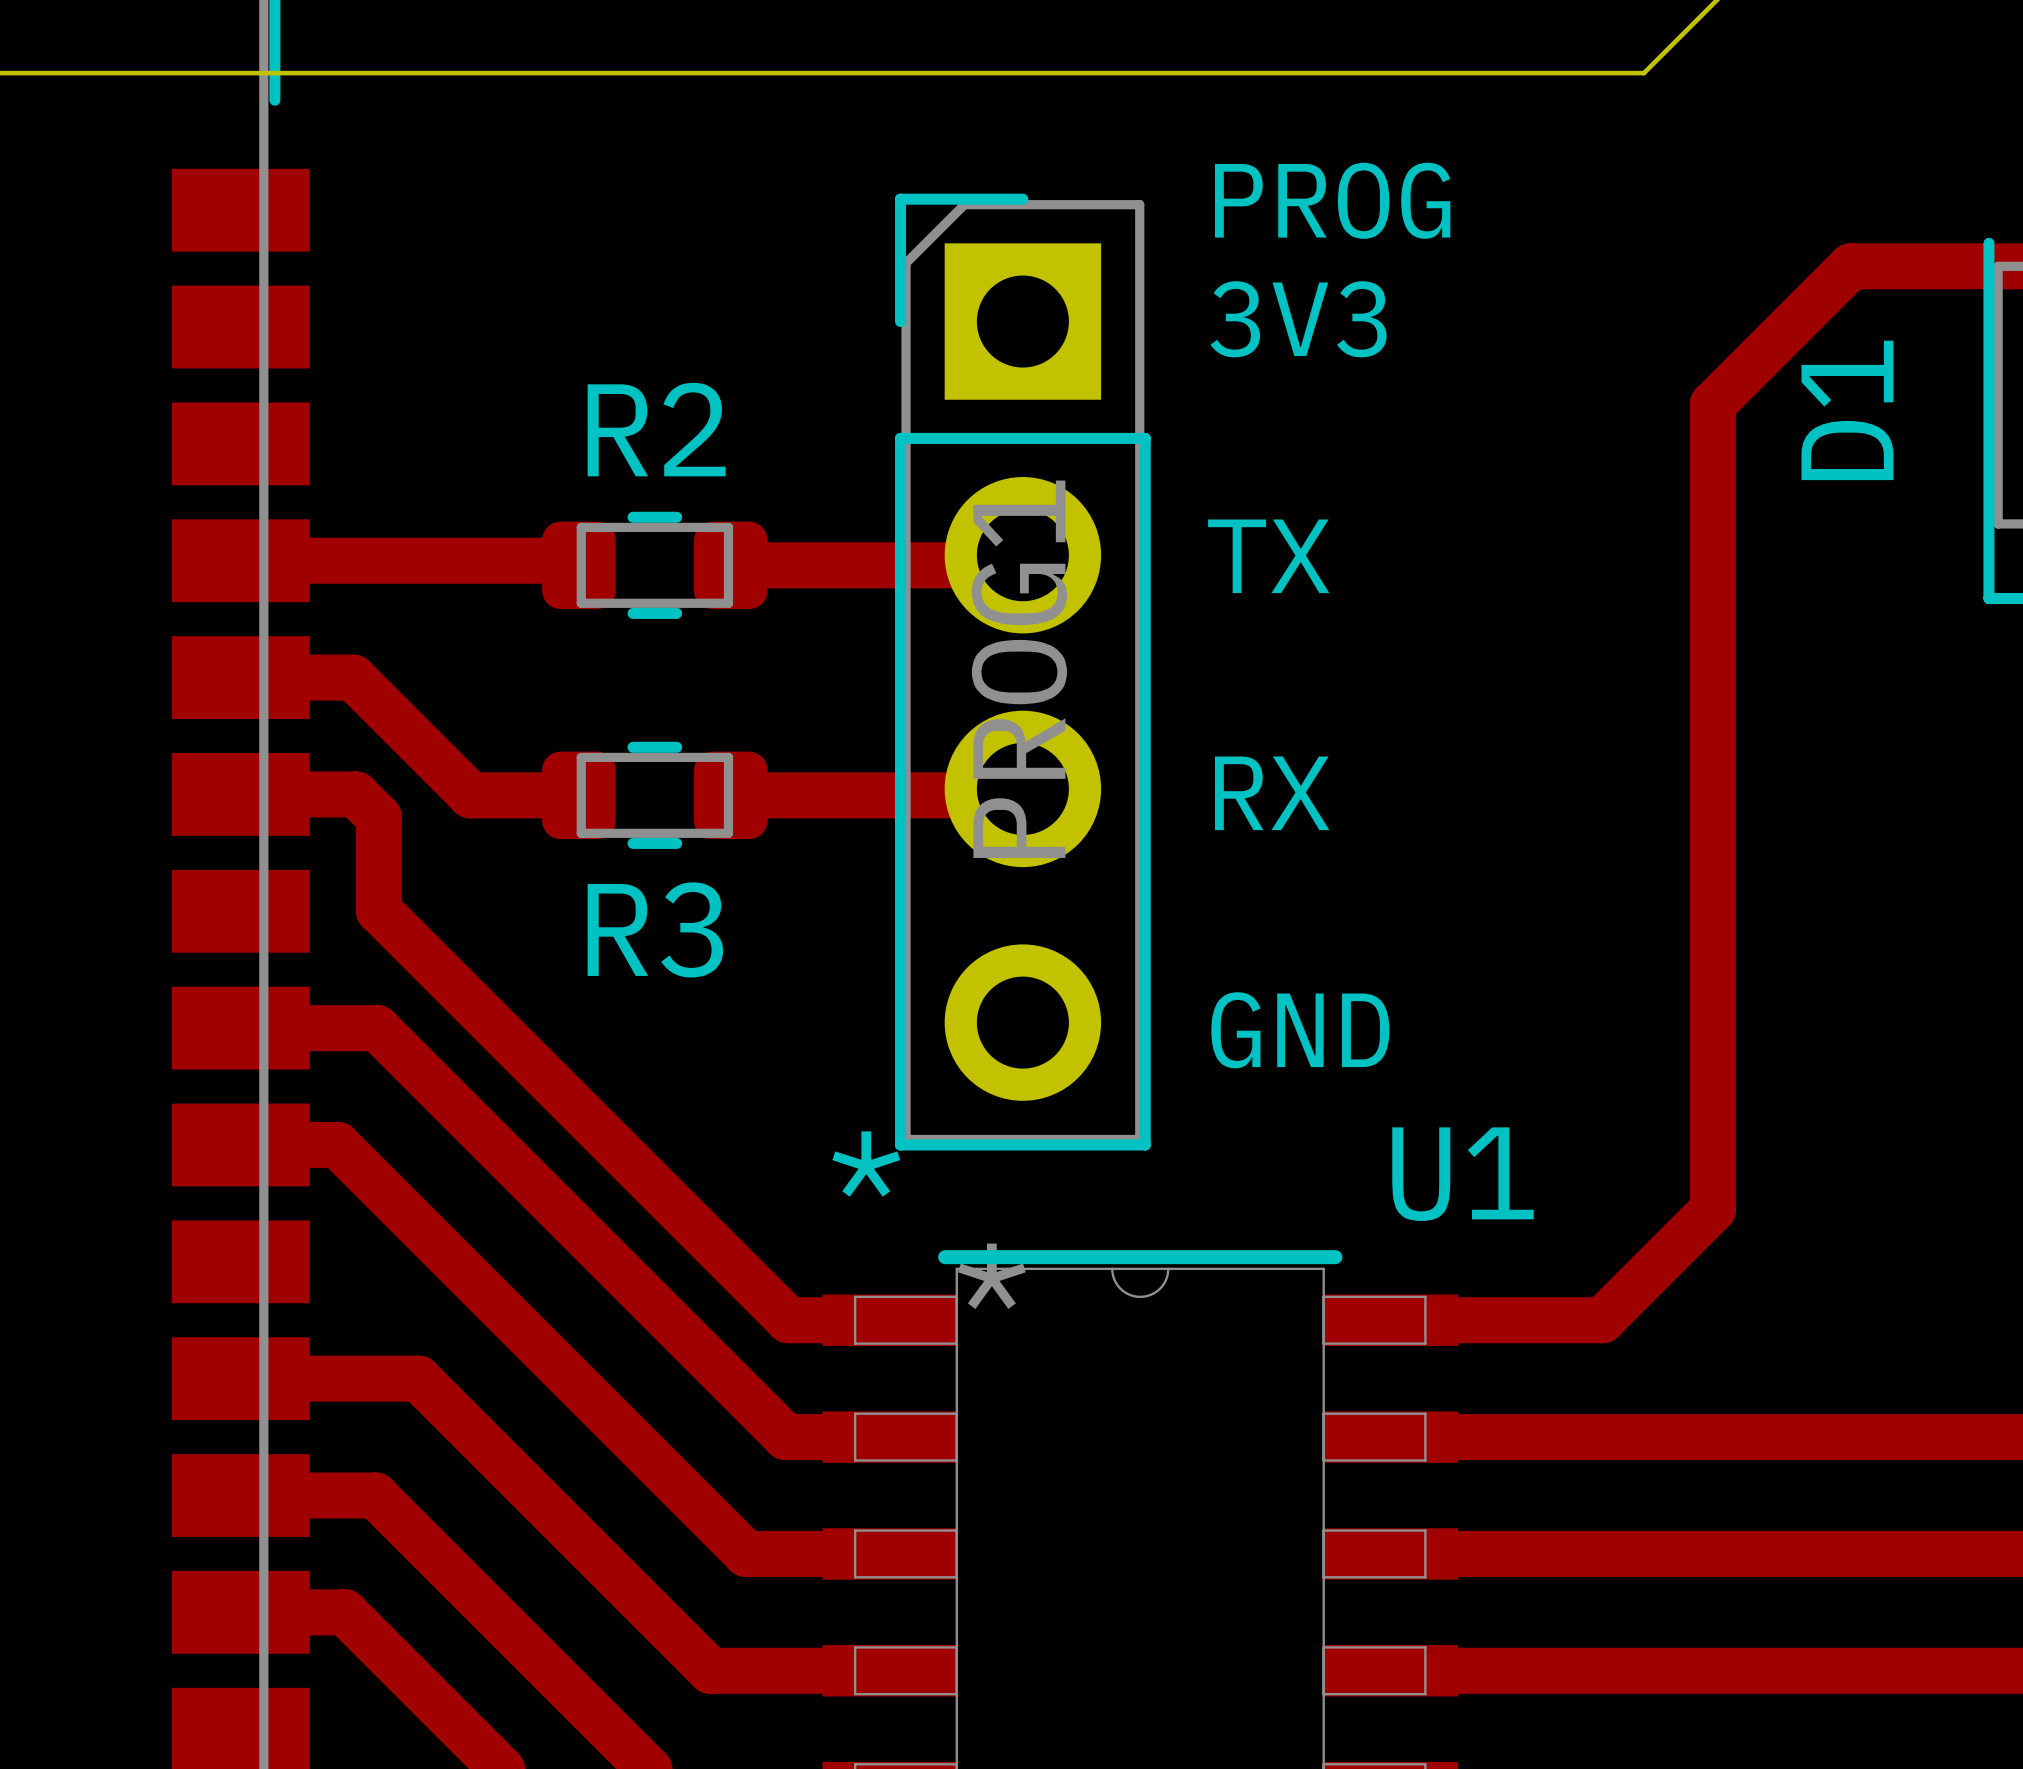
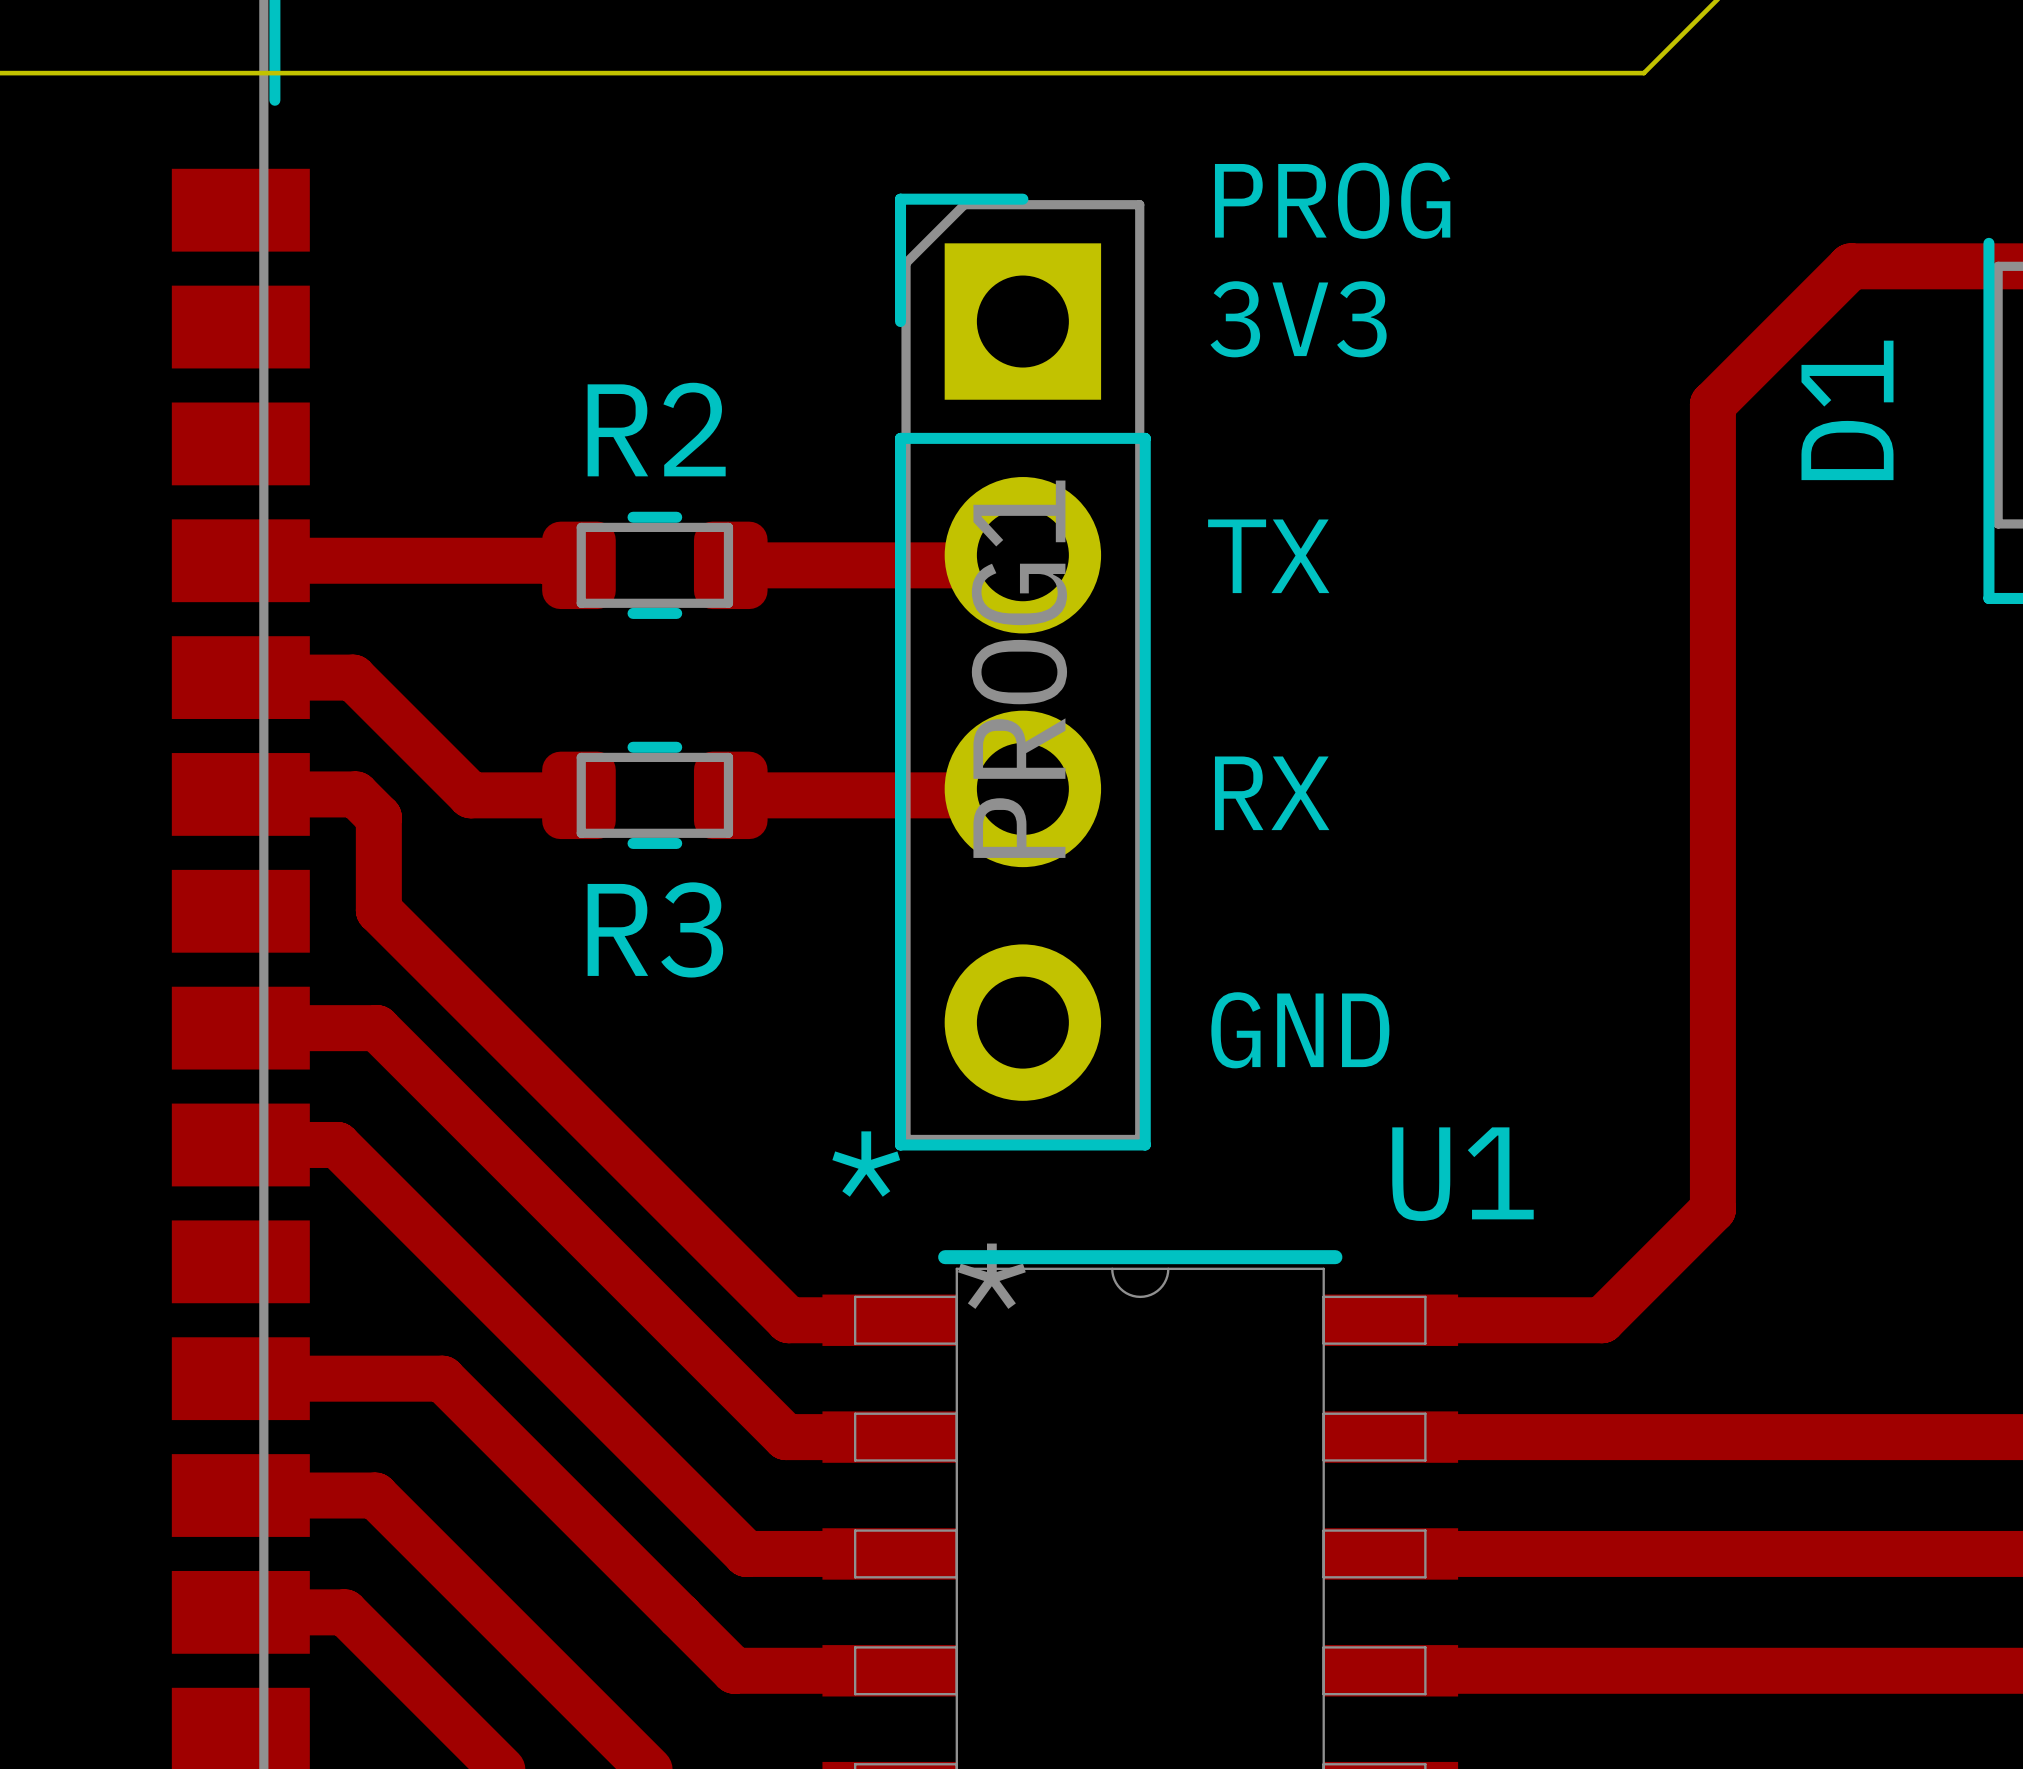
track: (418, 1378) (710, 1670) (734, 1670) -> (418, 1378) (442, 1378) (734, 1670)

